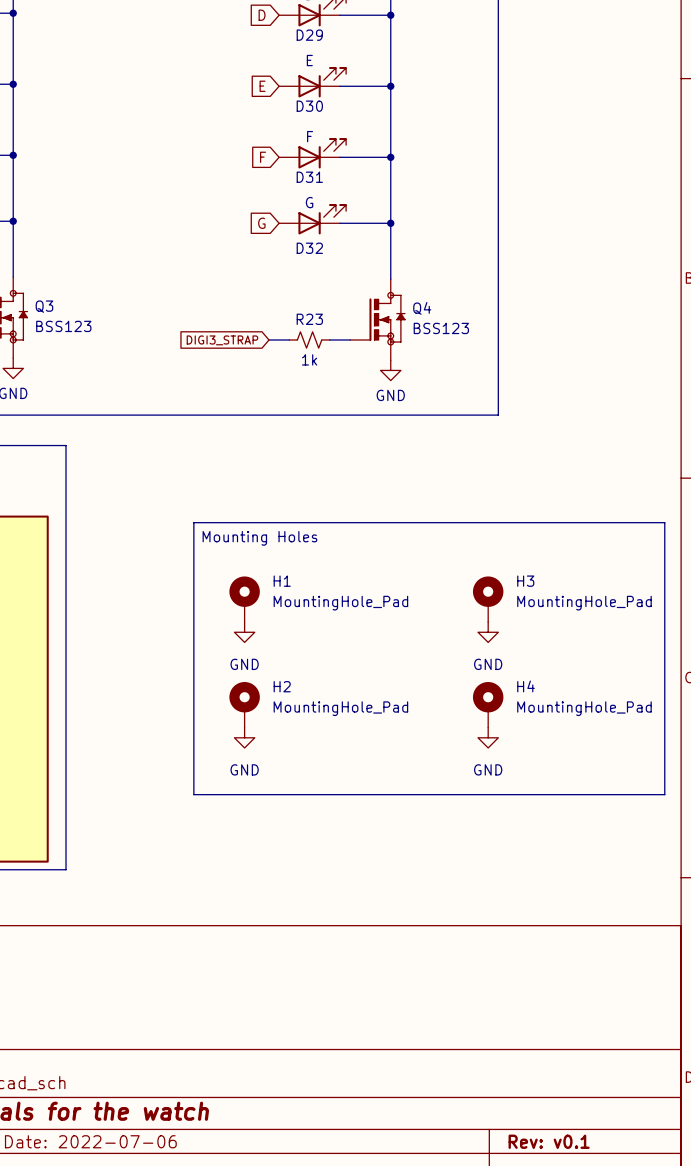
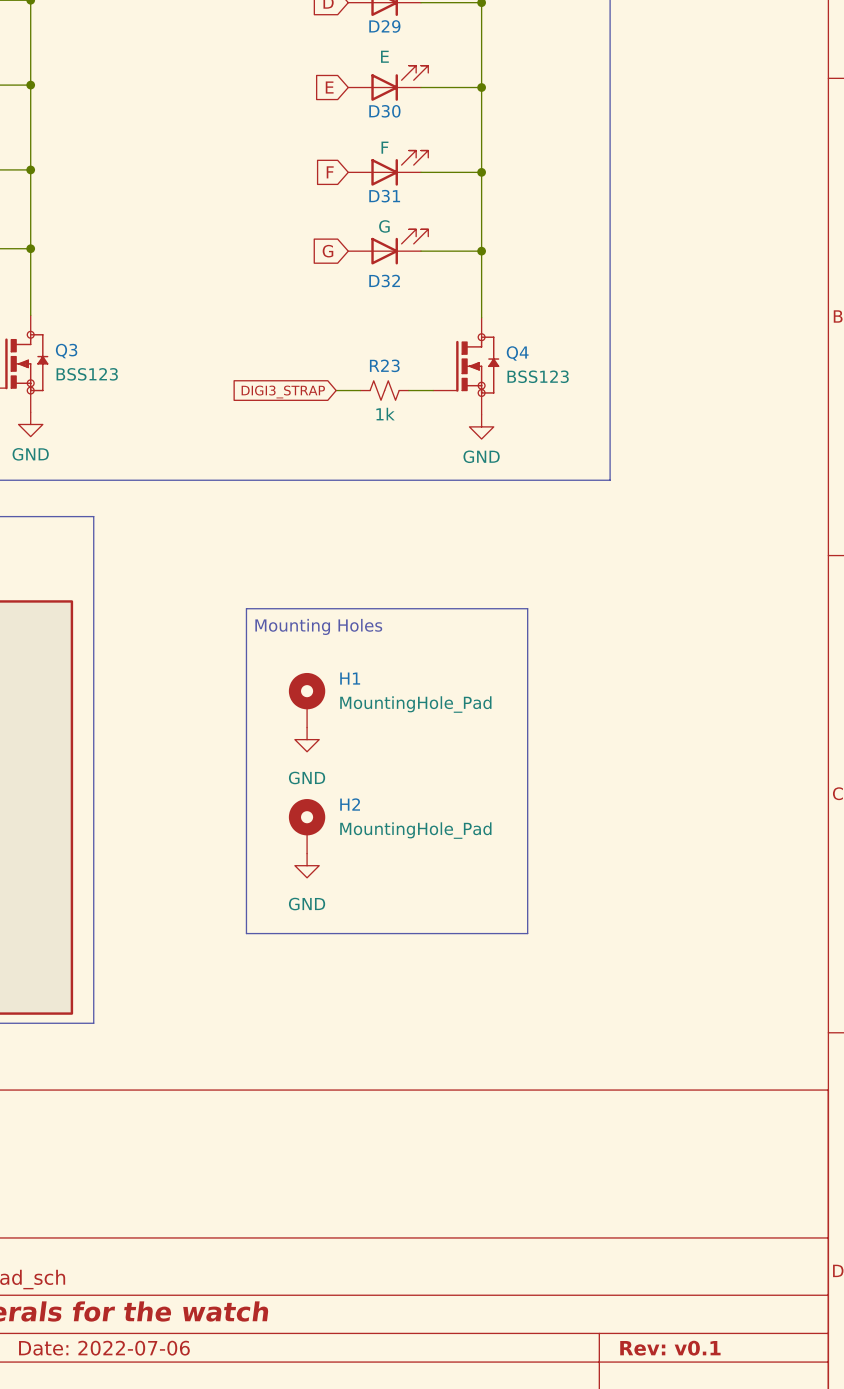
line: (429, 522) (664, 522) (664, 794) (429, 794) -> (527, 608) (527, 933)
H3: MountingHole_Pad (488, 599) -> none
power symbol: GND (488, 632) -> none
H4: MountingHole_Pad (488, 704) -> none
power symbol: GND (488, 737) -> none

